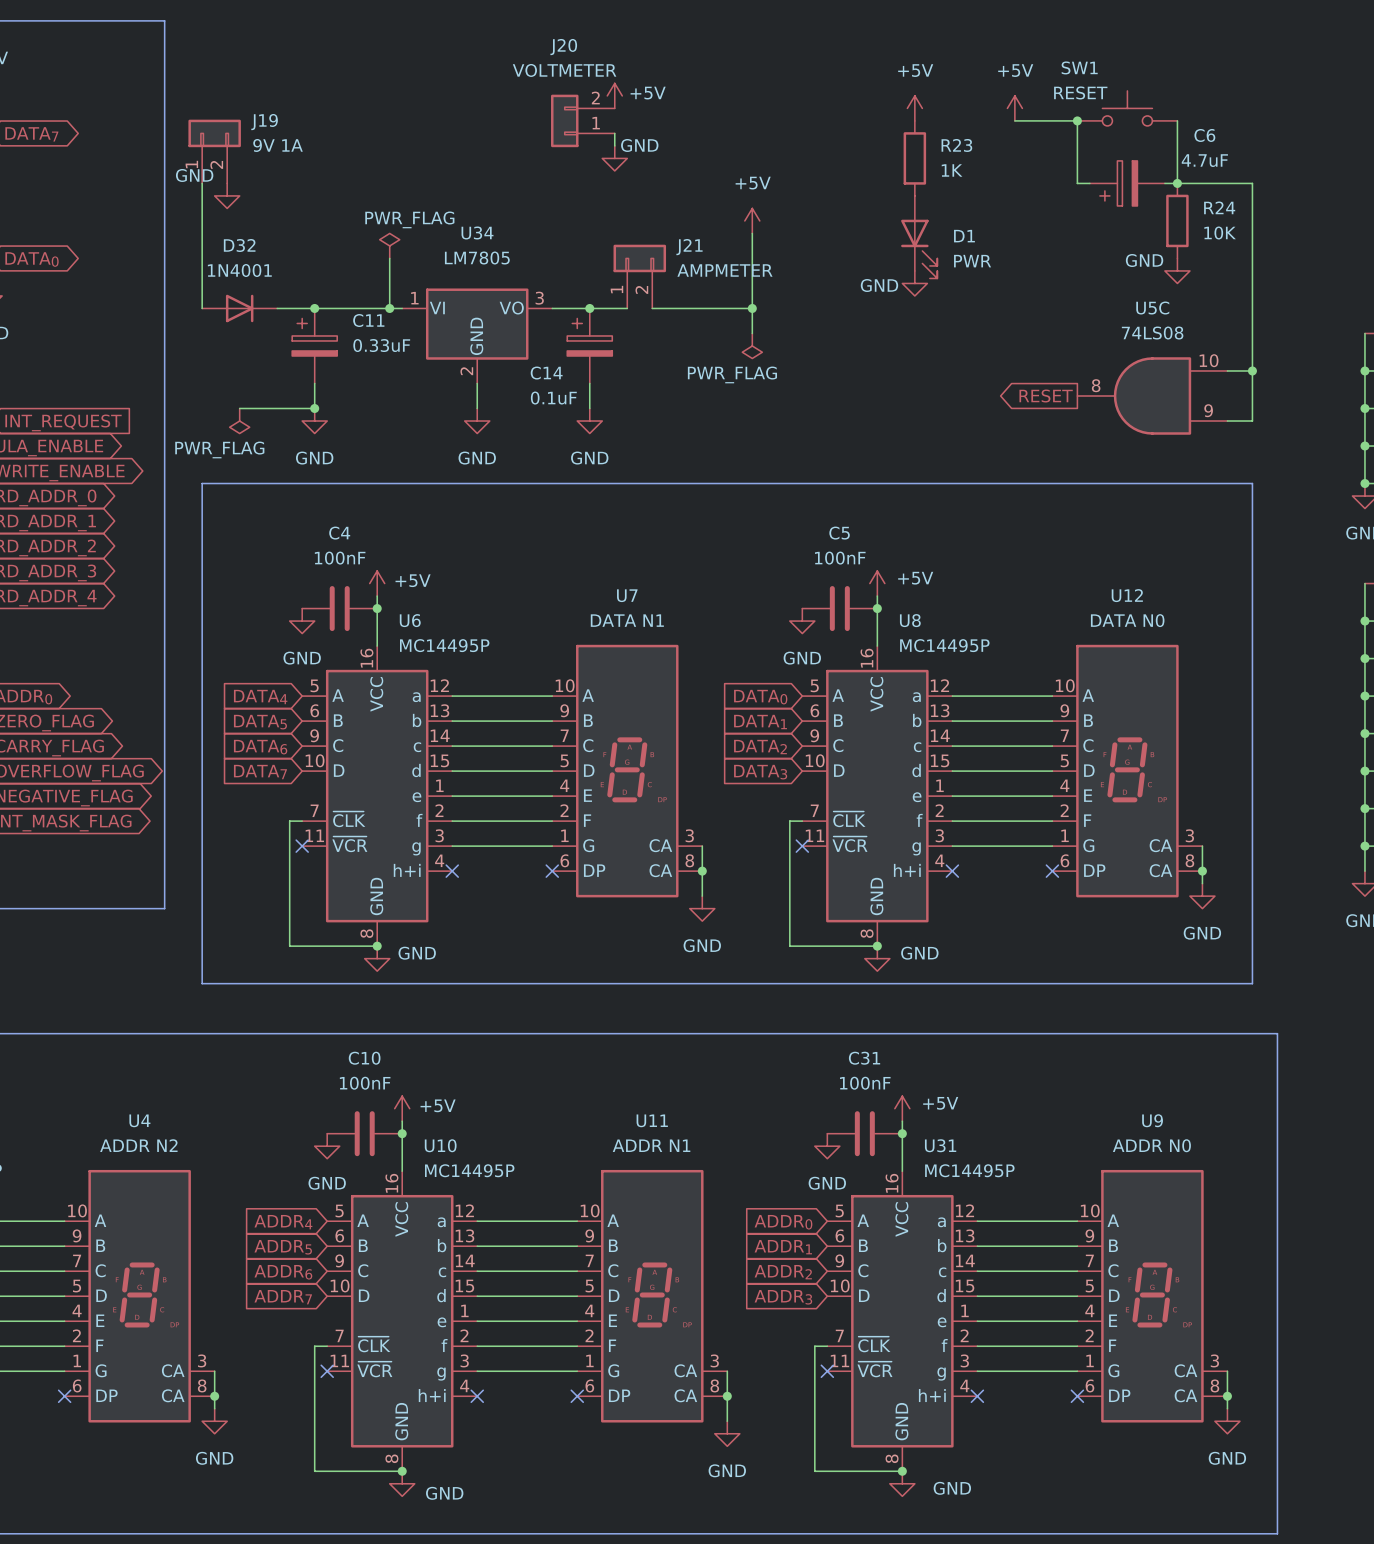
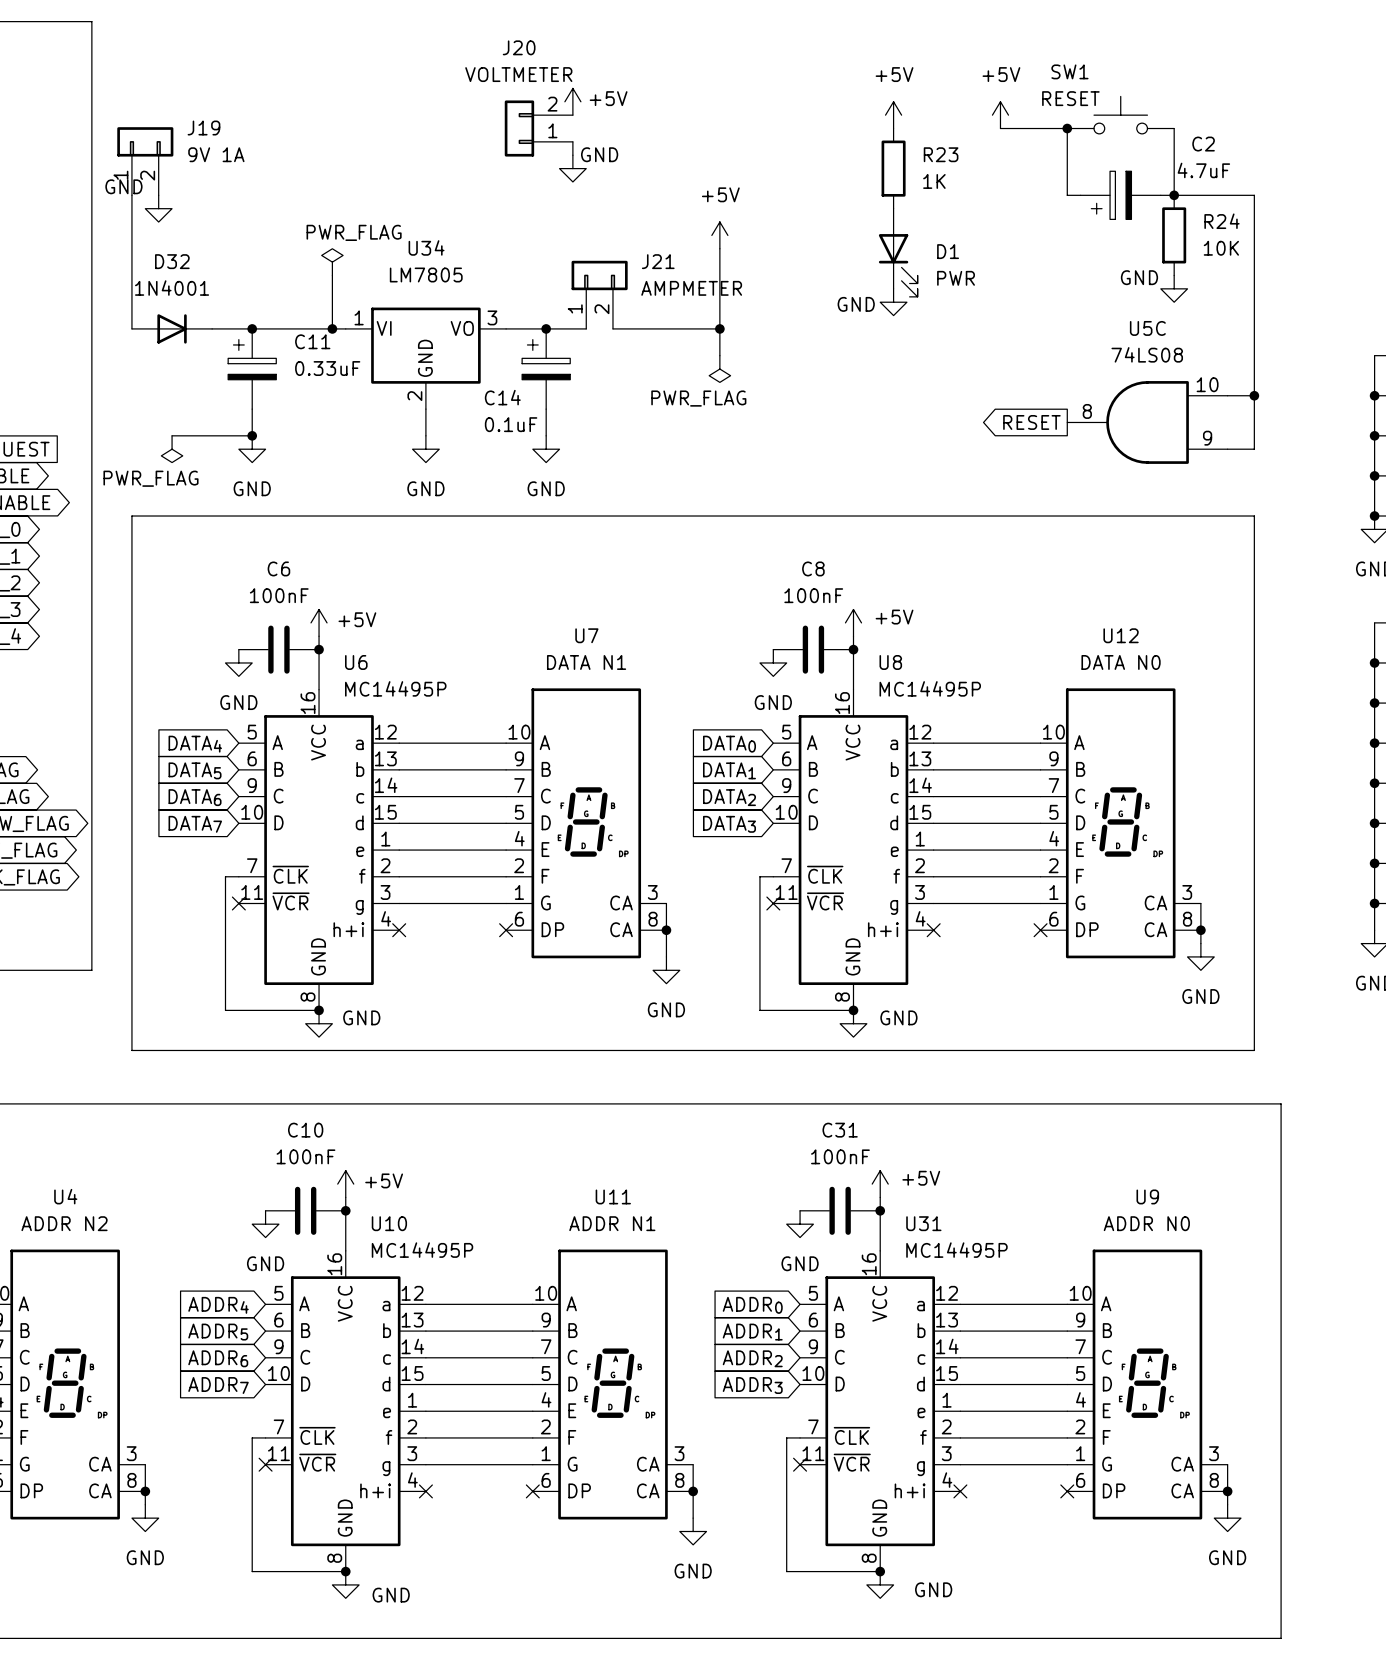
C6 name: C6 (1204, 135) -> C2 (1203, 144)
C4 name: C4 (339, 533) -> C6 (278, 568)
C5 name: C5 (839, 533) -> C8 (813, 568)

